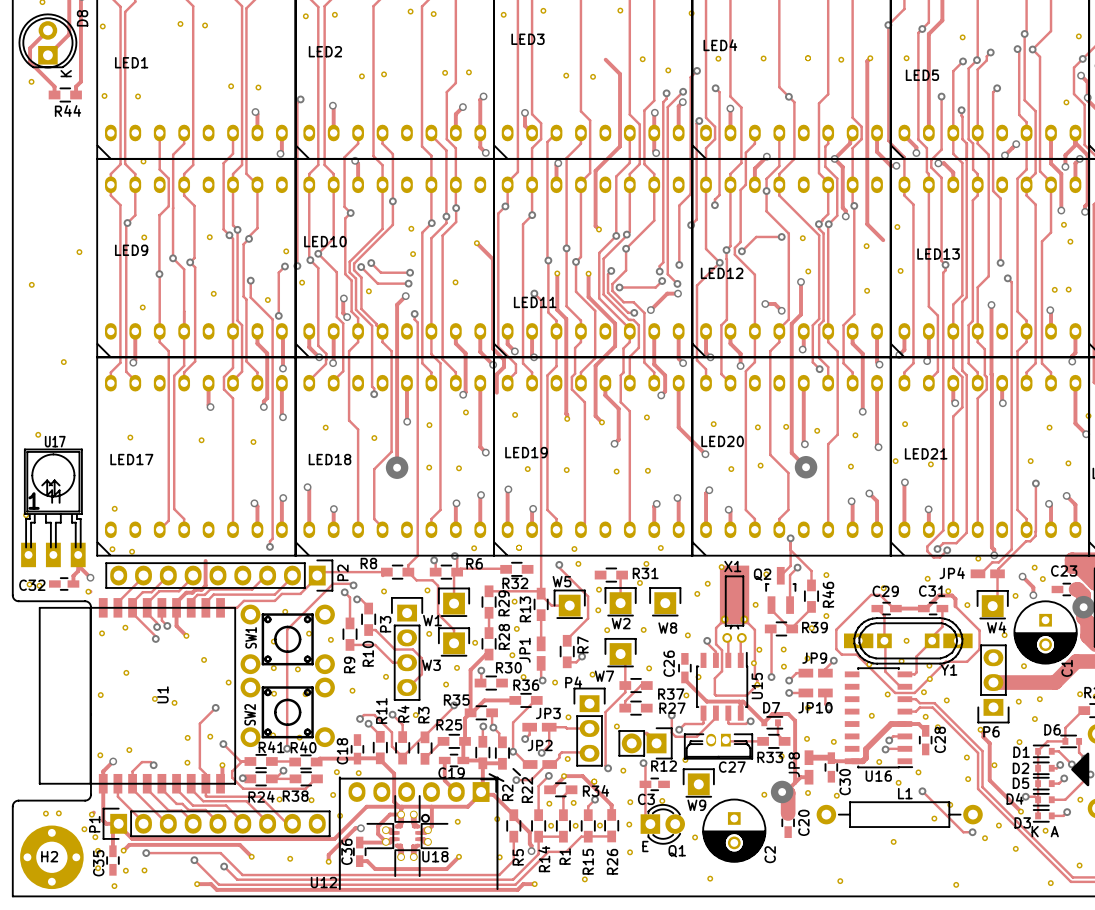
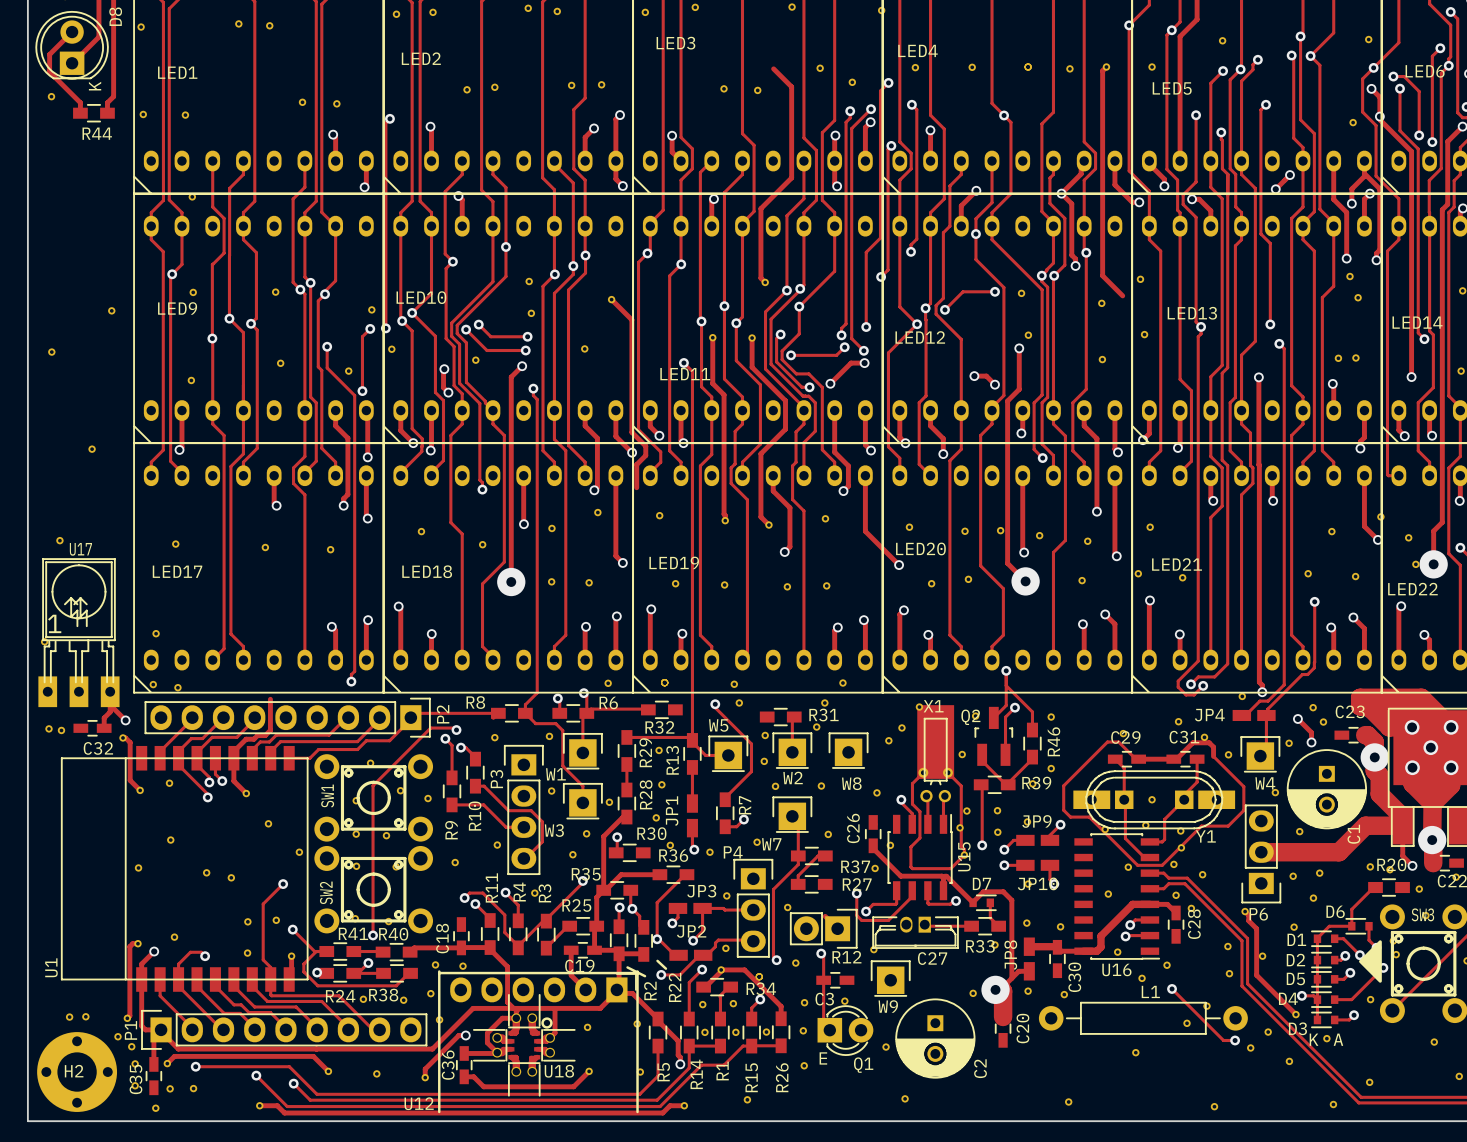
C32 name position: C32 (32, 585) -> C32 (98, 748)
track: none -> (125, 737) (130, 742) (130, 780) (140, 790)
board edge: (12, 595) (17, 601) (85, 601) (90, 607) (90, 796) (85, 800) (17, 800) (12, 806) -> (27, 742) (27, 1008)
U1 name position: U1 (162, 694) -> U1 (51, 967)
track: none -> (137, 943) (132, 943) (129, 946) (129, 1015)

